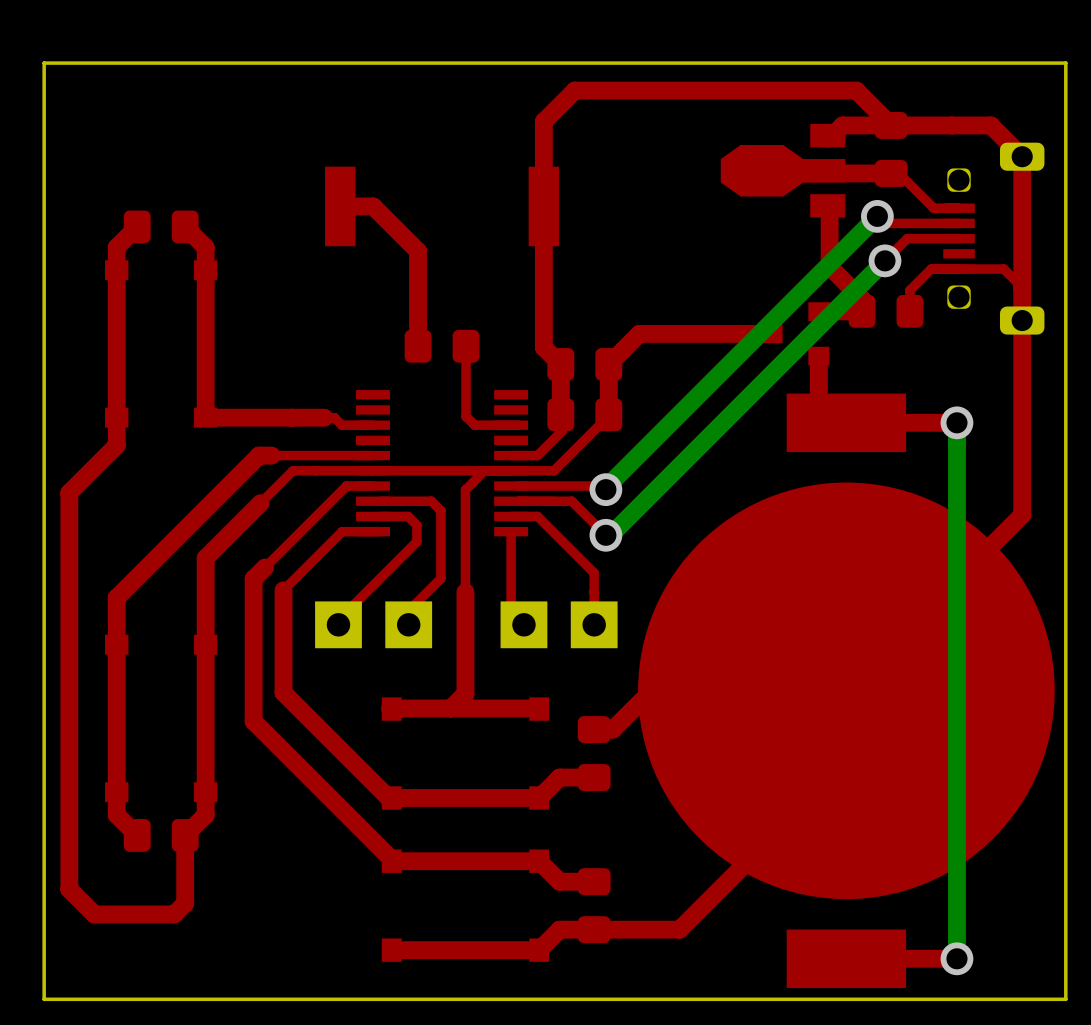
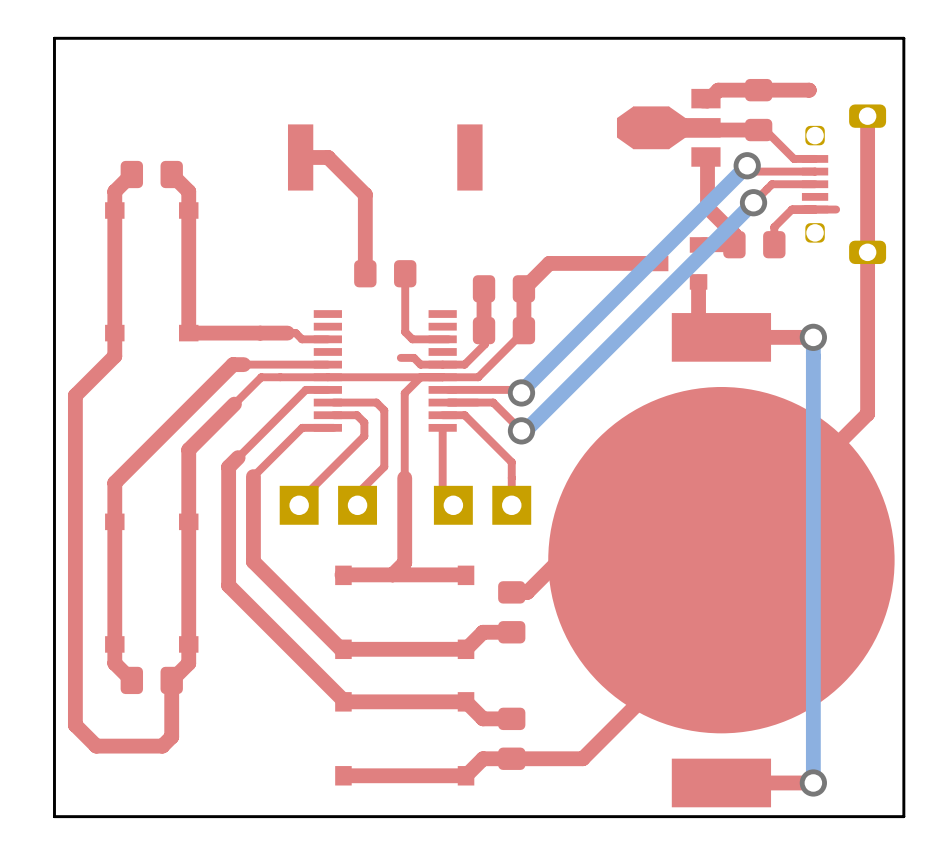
top track: (891, 125) (856, 90) (574, 90) (543, 121) (543, 181) -> none
top track: (951, 125) (990, 125) (1022, 156) -> none
top track: (543, 206) (543, 347) (560, 364) -> none
top track: (984, 269) (1003, 269) (1022, 287) -> none
top track: none -> (400, 357) (413, 357) (420, 364) (442, 364)

